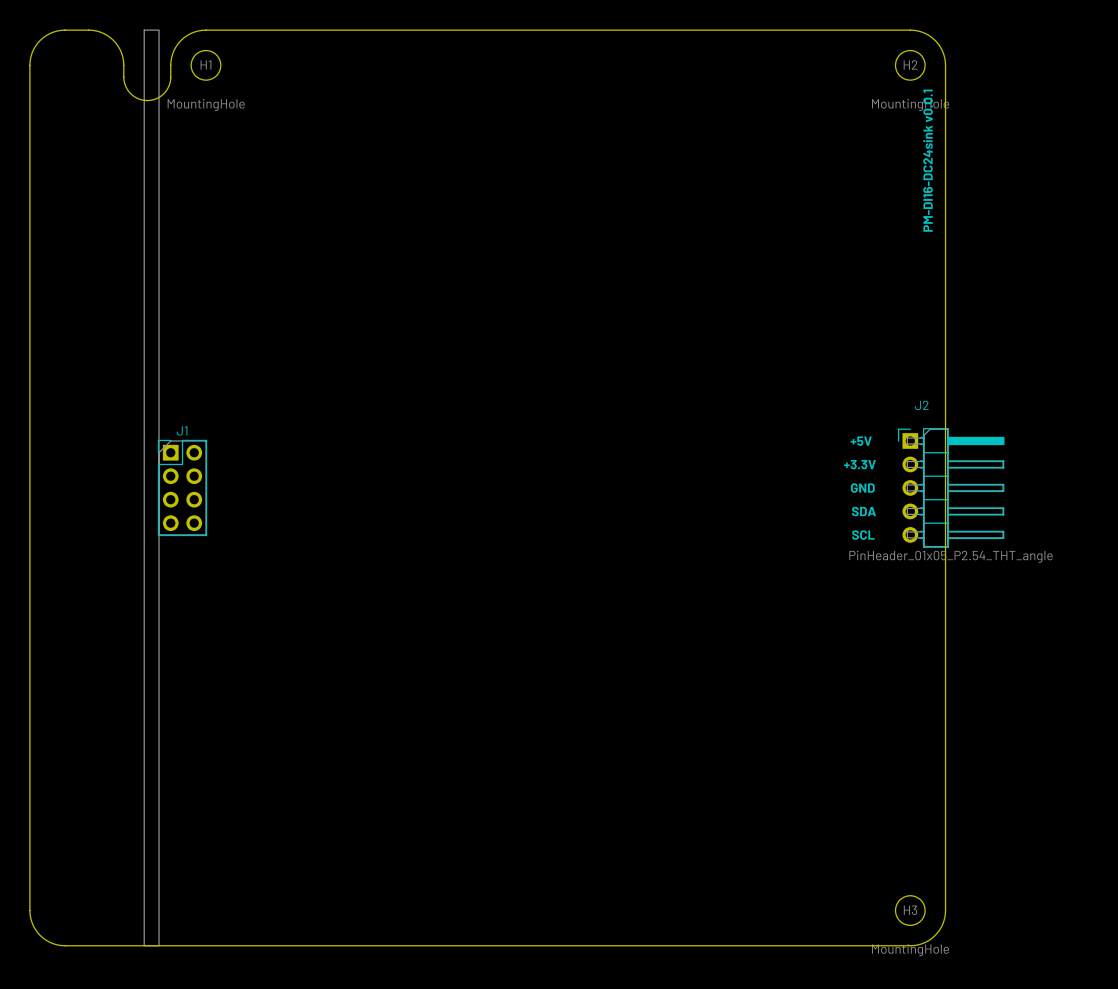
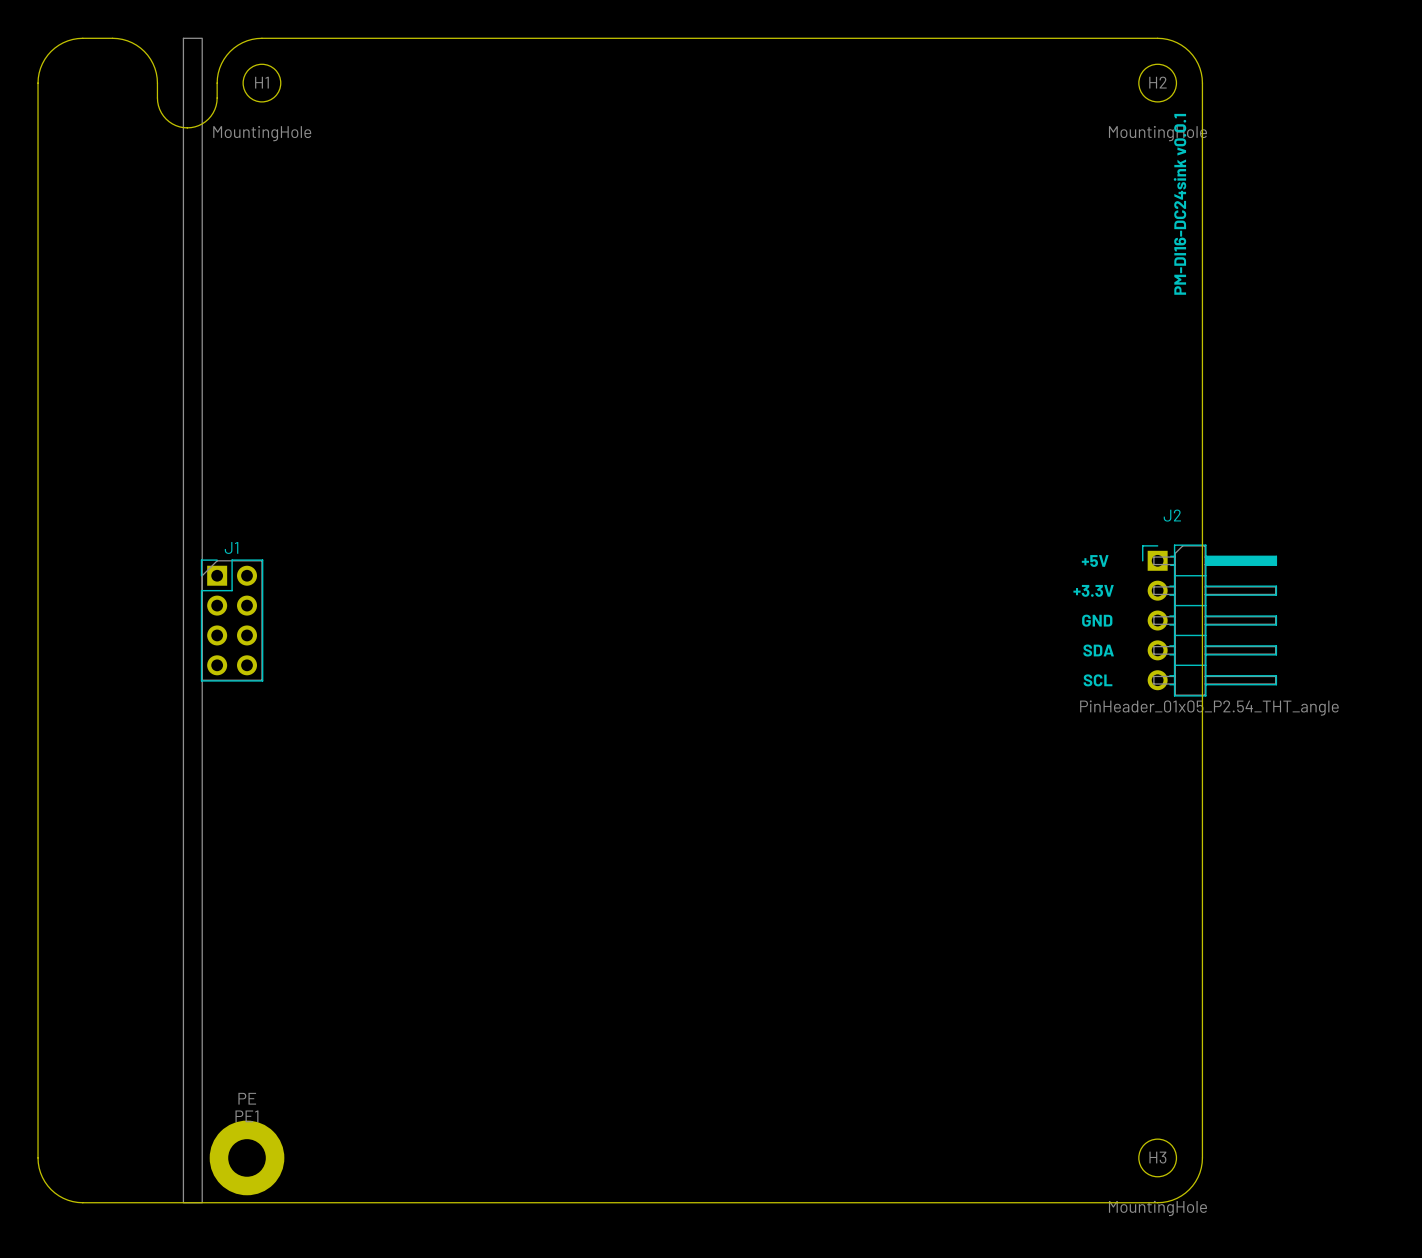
PE1: none -> PE (247, 1157)

